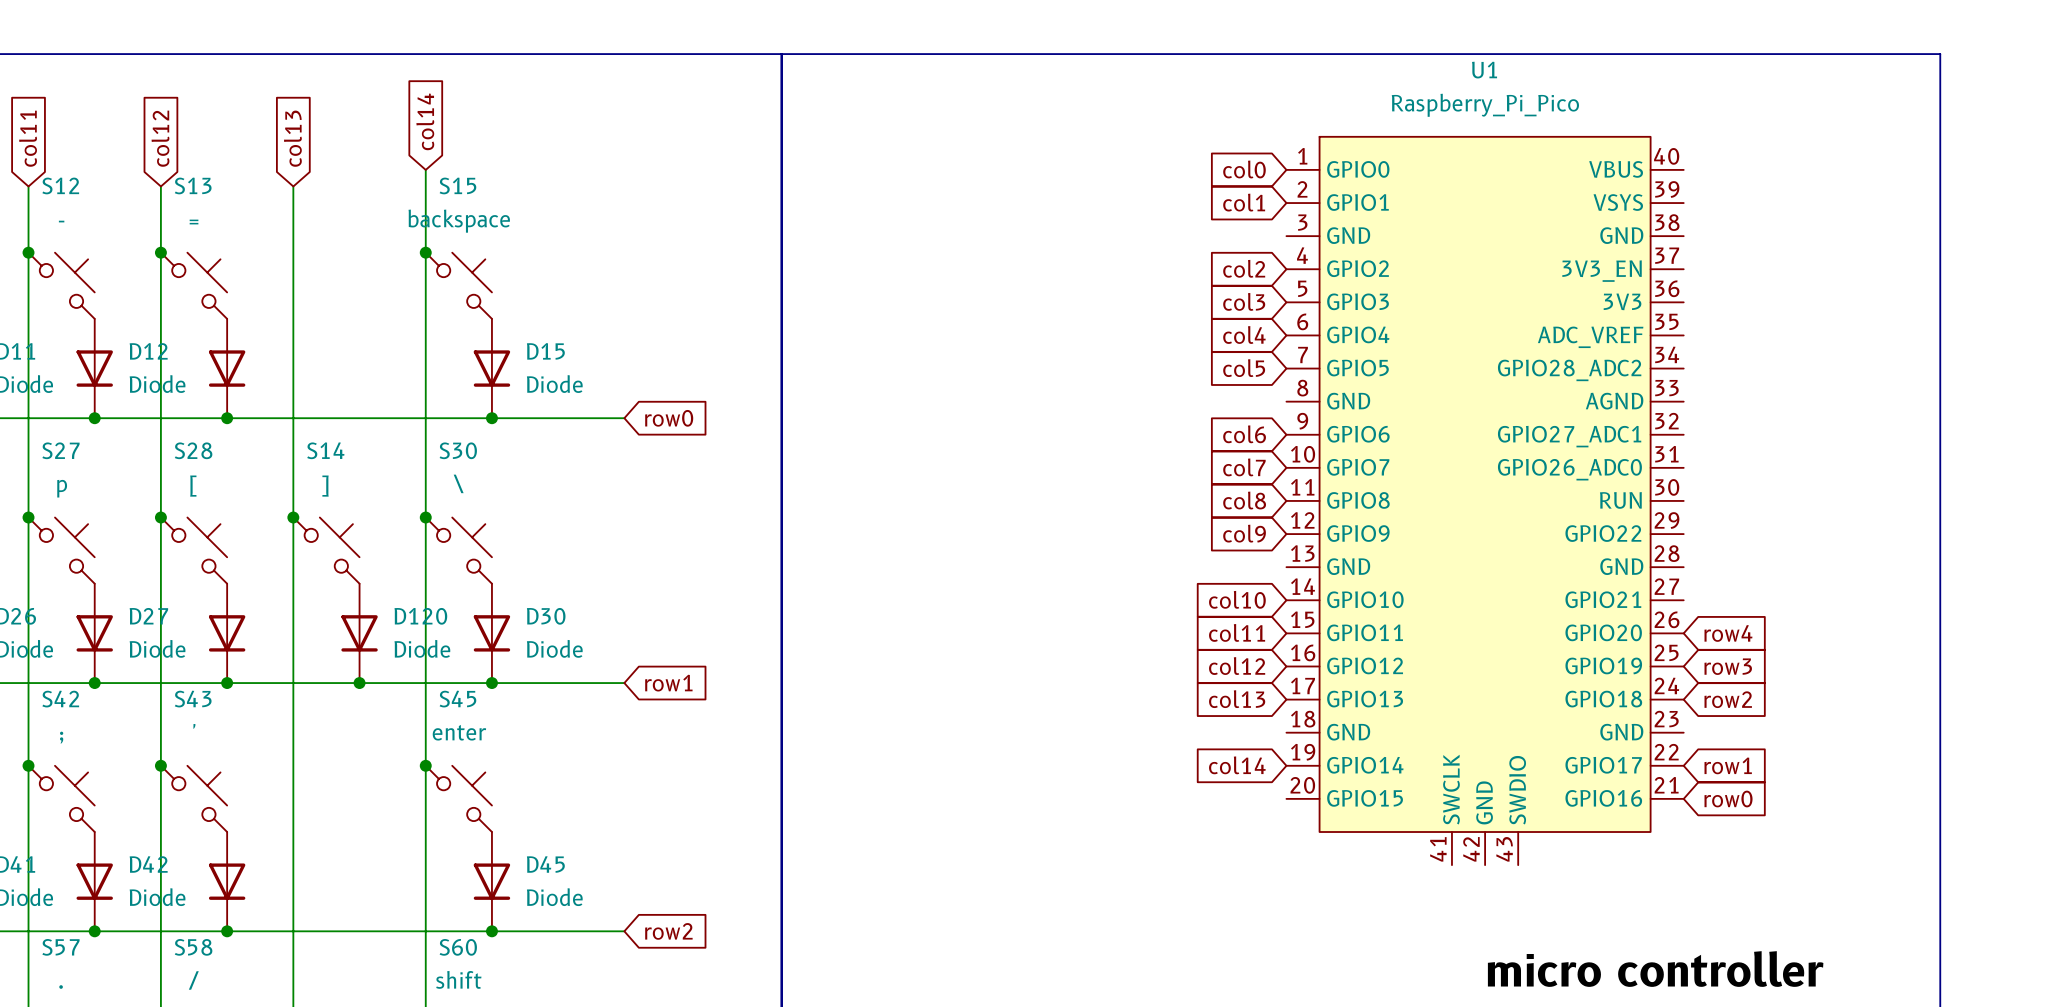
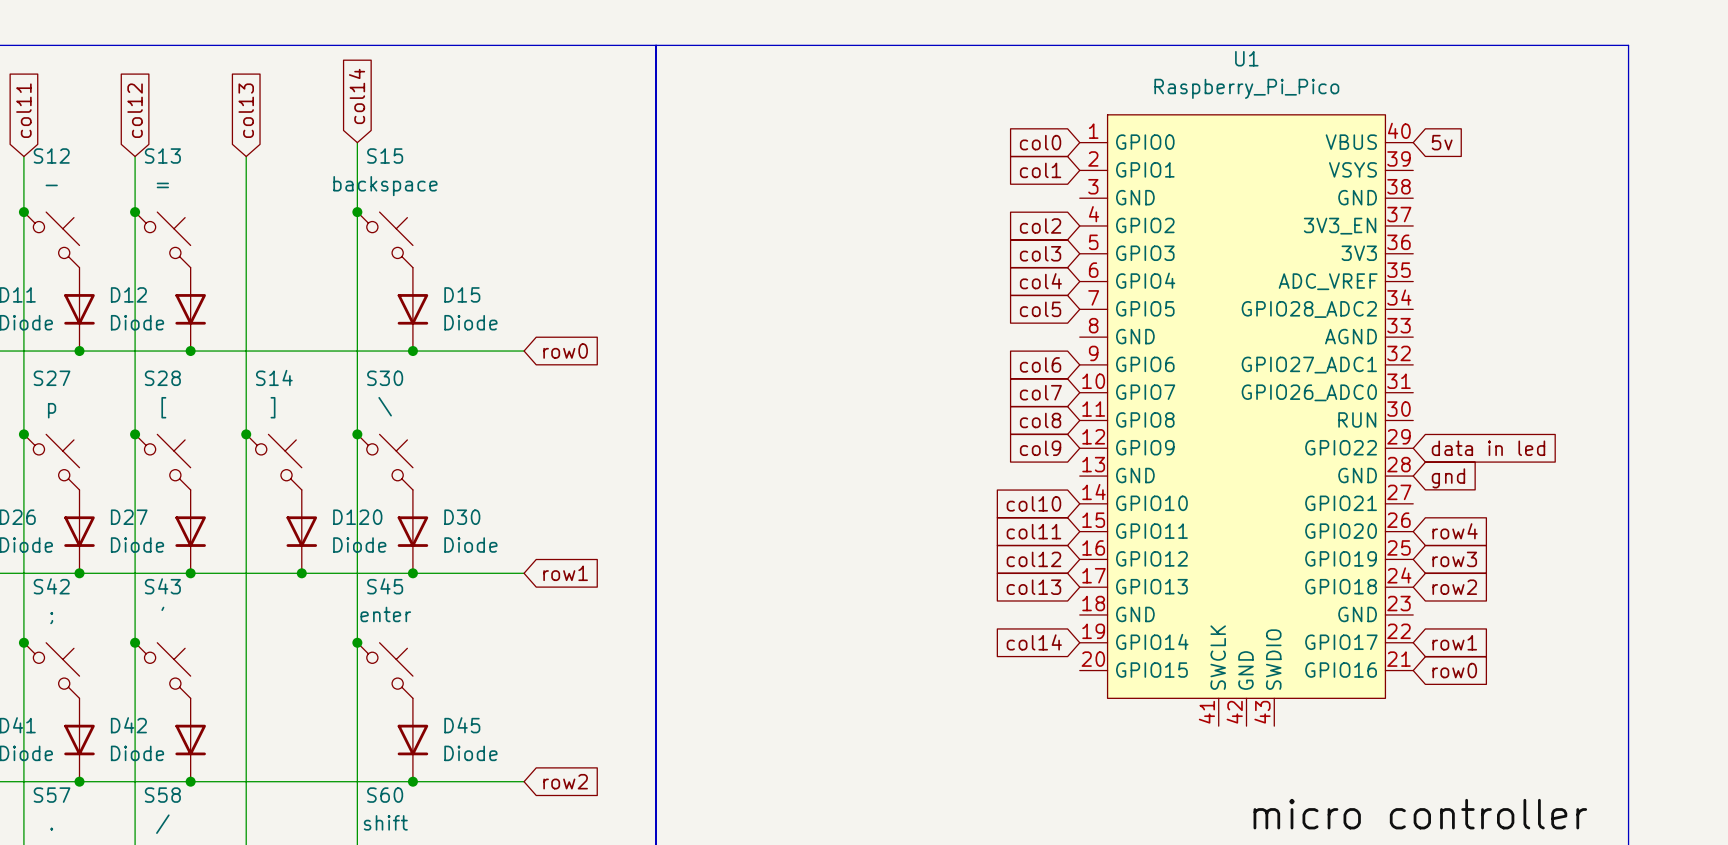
global label: none -> 5v (1442, 142)
global label: none -> data in led (1488, 448)
global label: none -> gnd (1448, 478)

